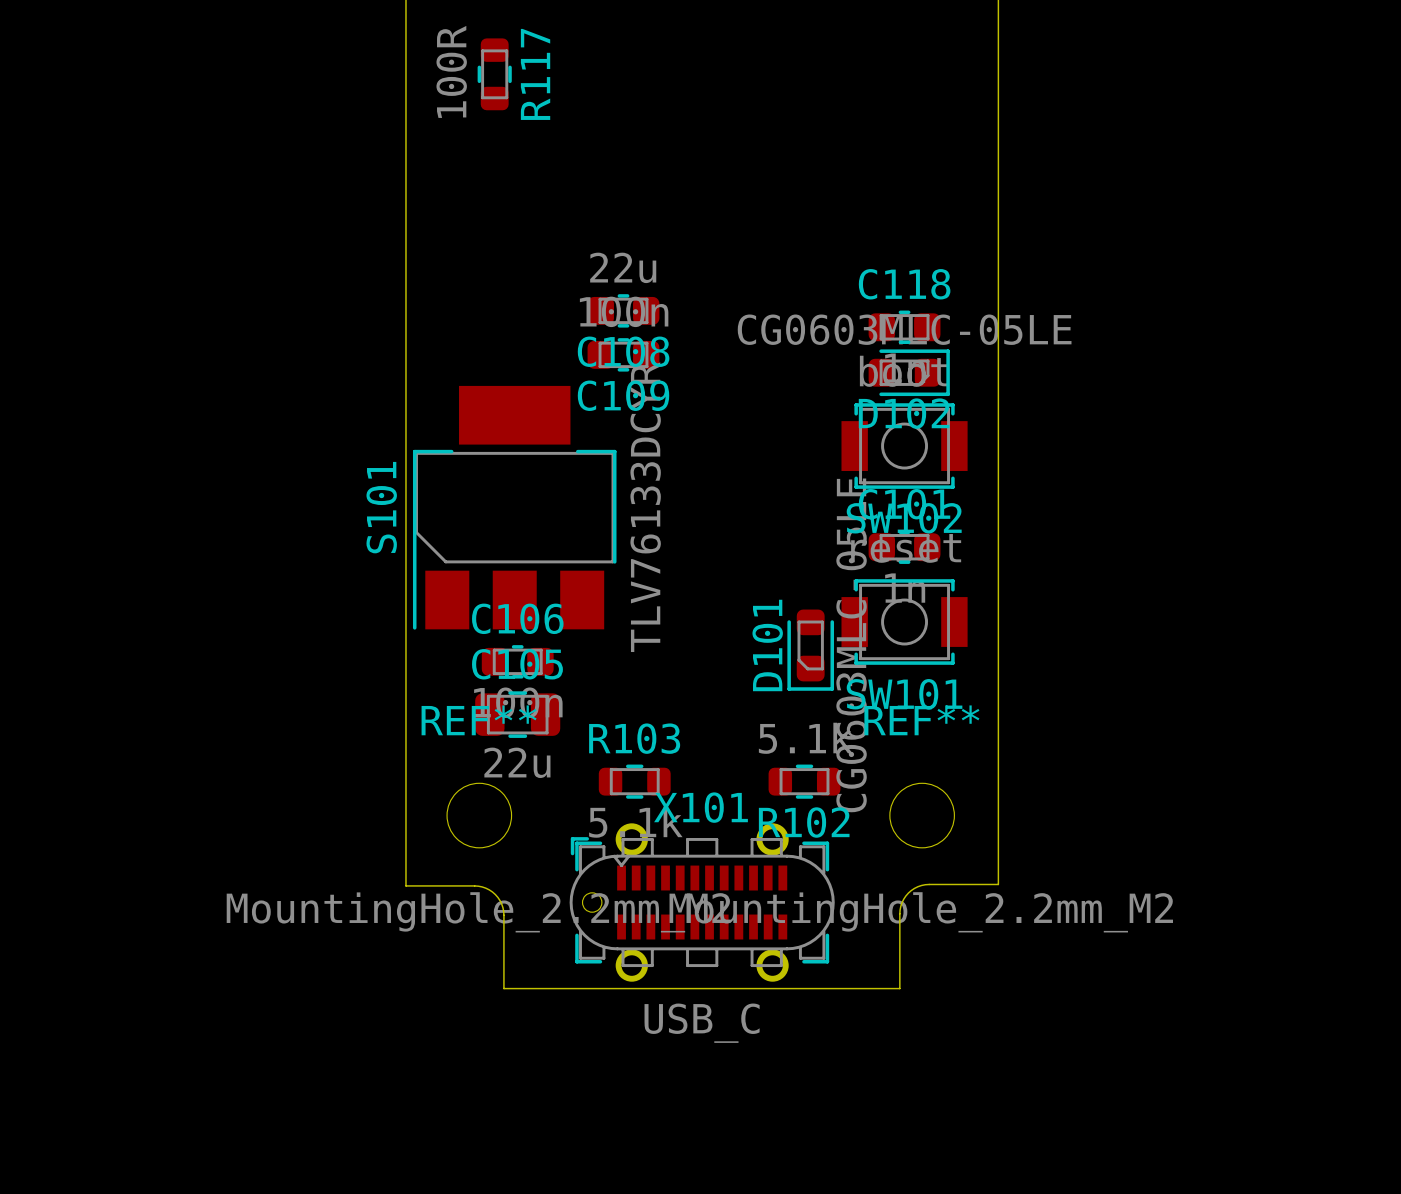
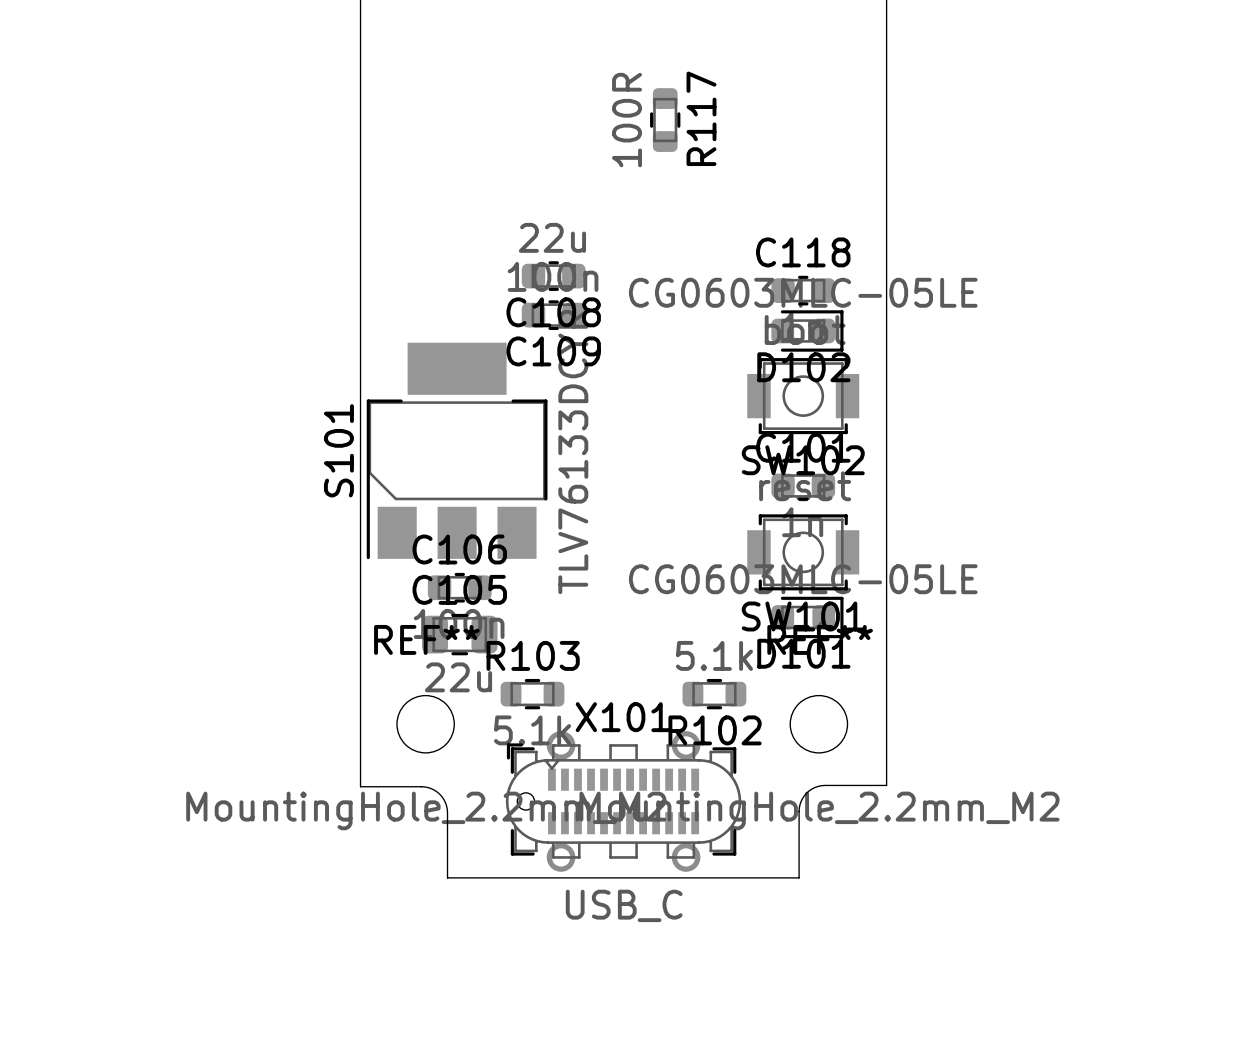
R117 position: (494, 74) -> (665, 120)
D101 rotation: 0° (810, 650) -> 90° counterclockwise (807, 617)
D101 position: (810, 650) -> (807, 617)
R103 position: (634, 781) -> (532, 694)

